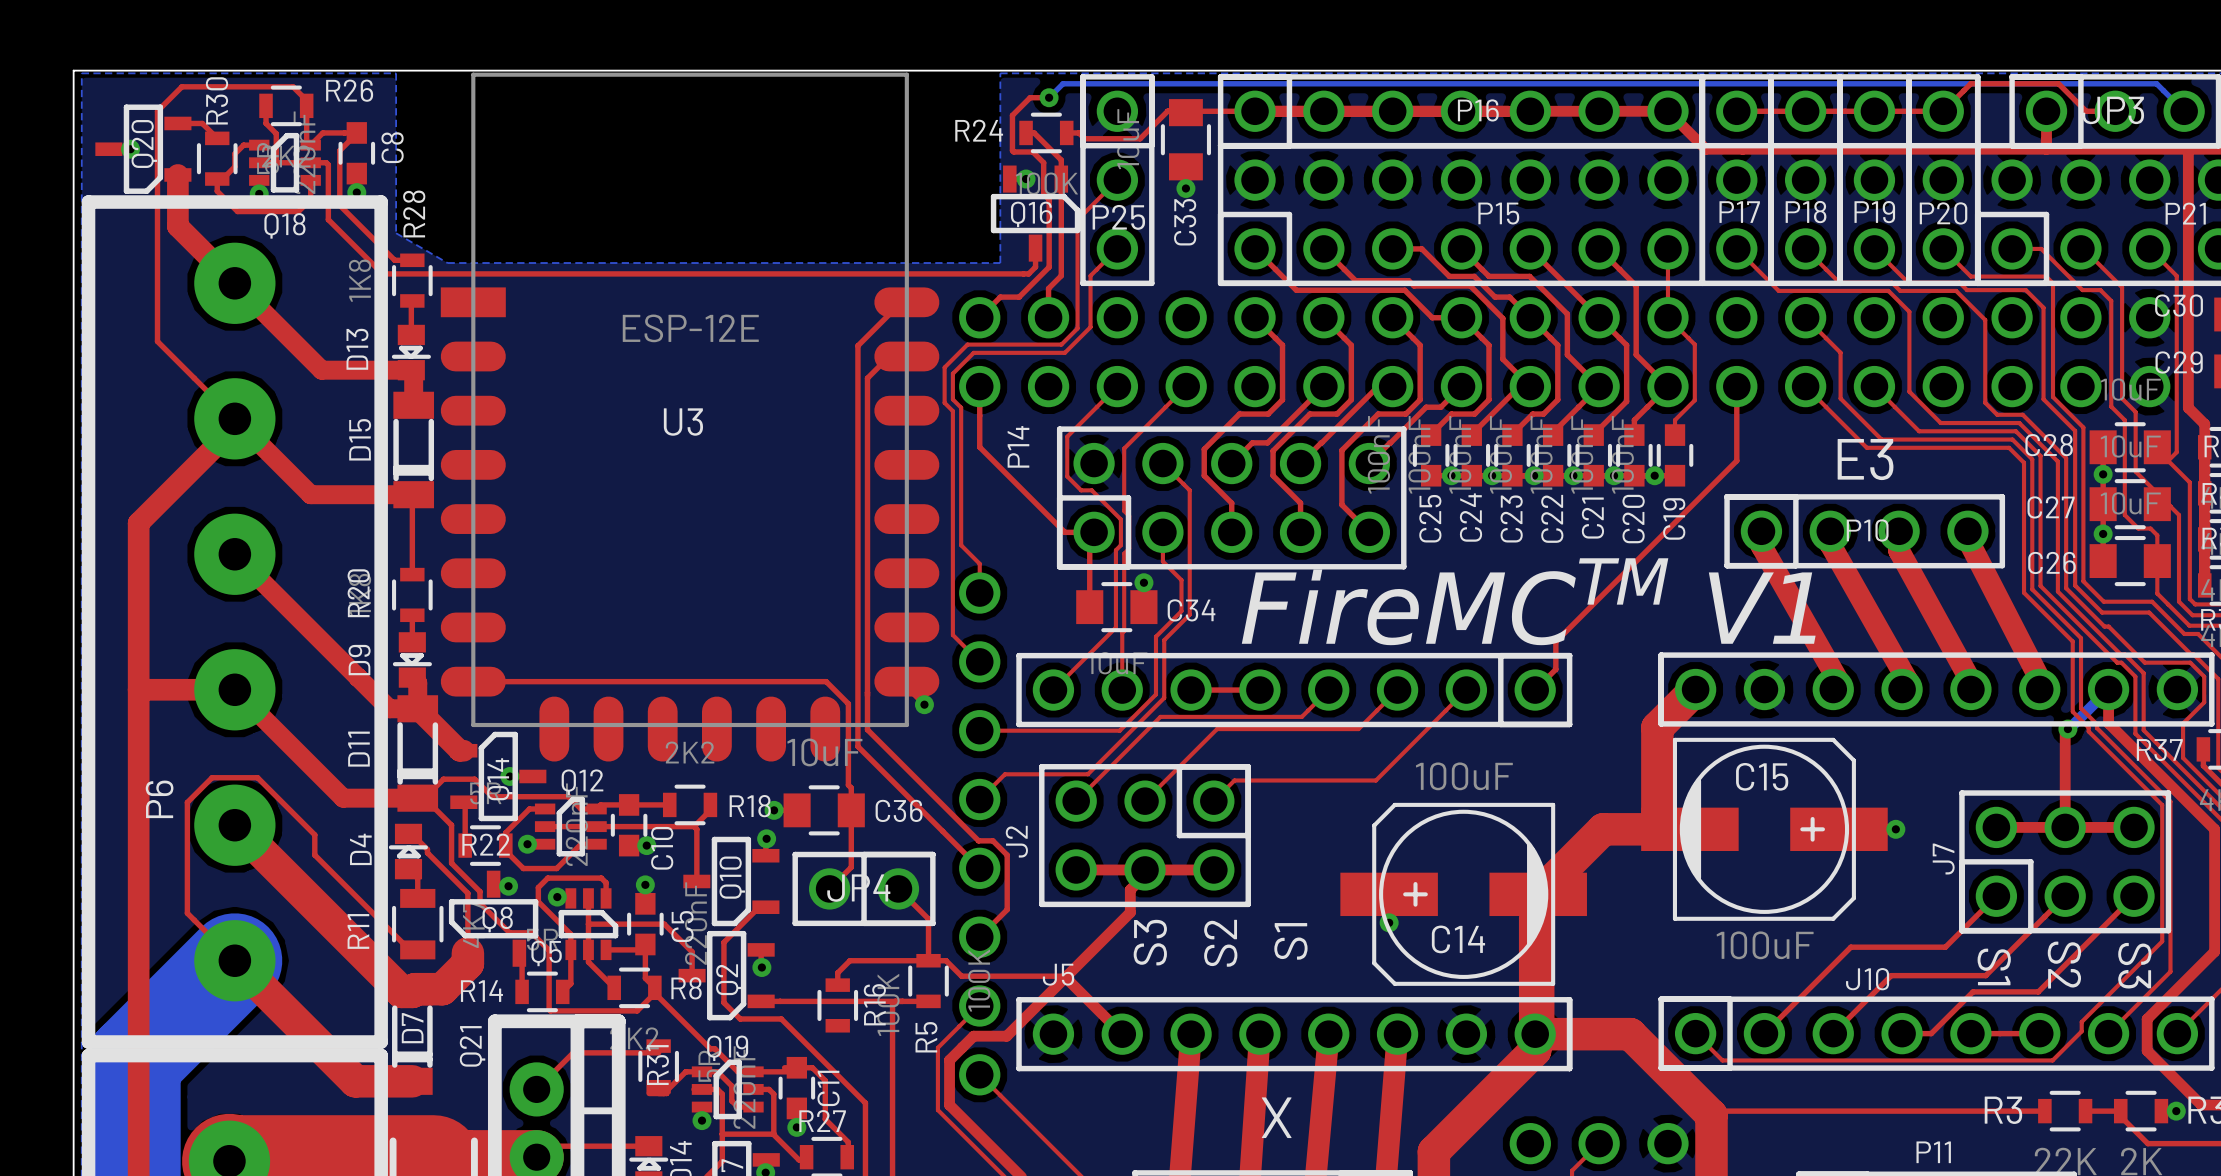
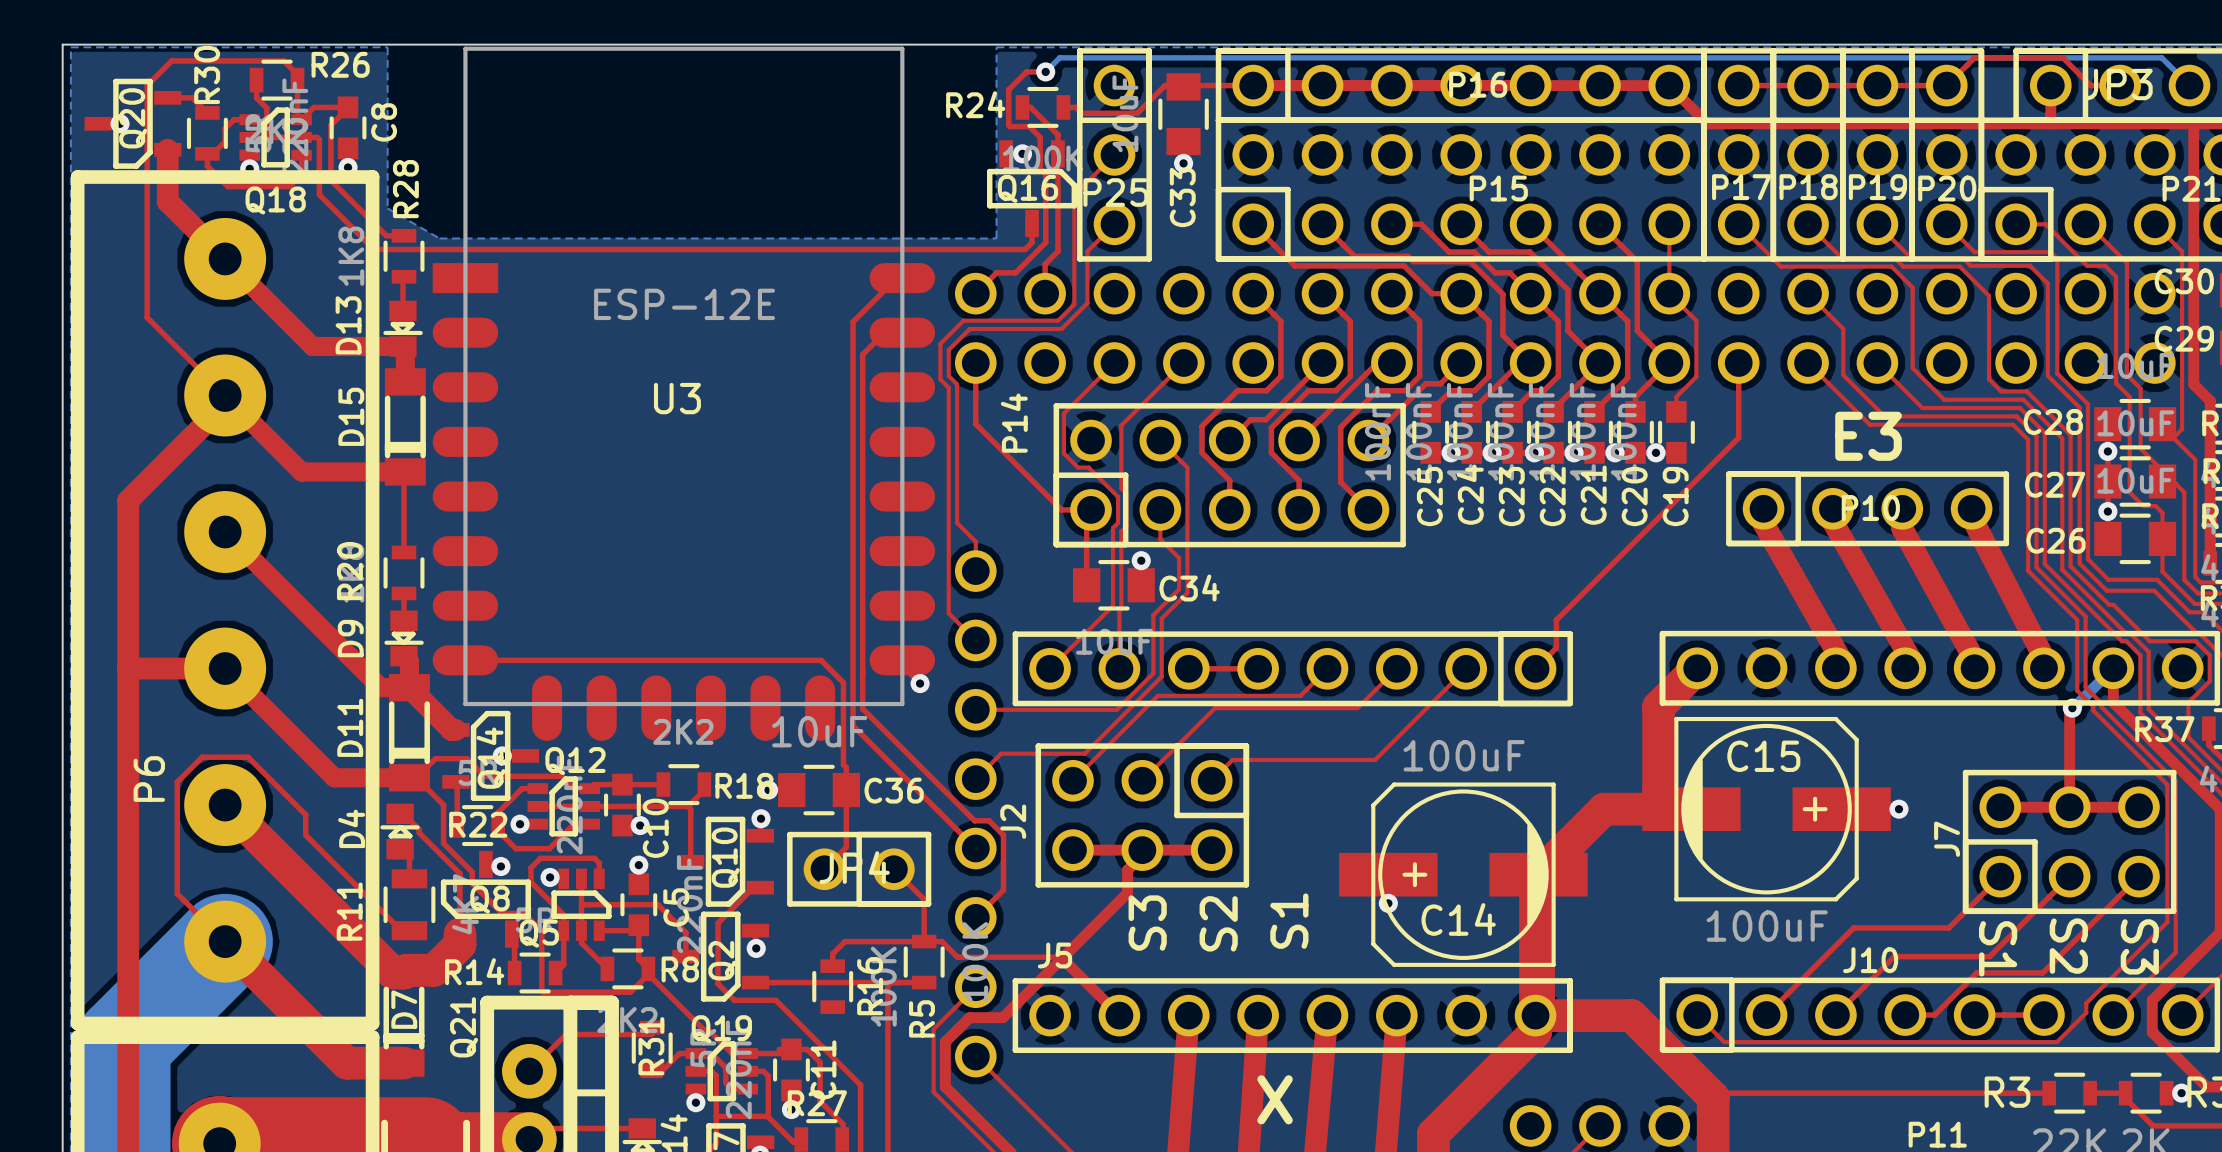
drawing: [1241, 558, 1816, 646] -> none

